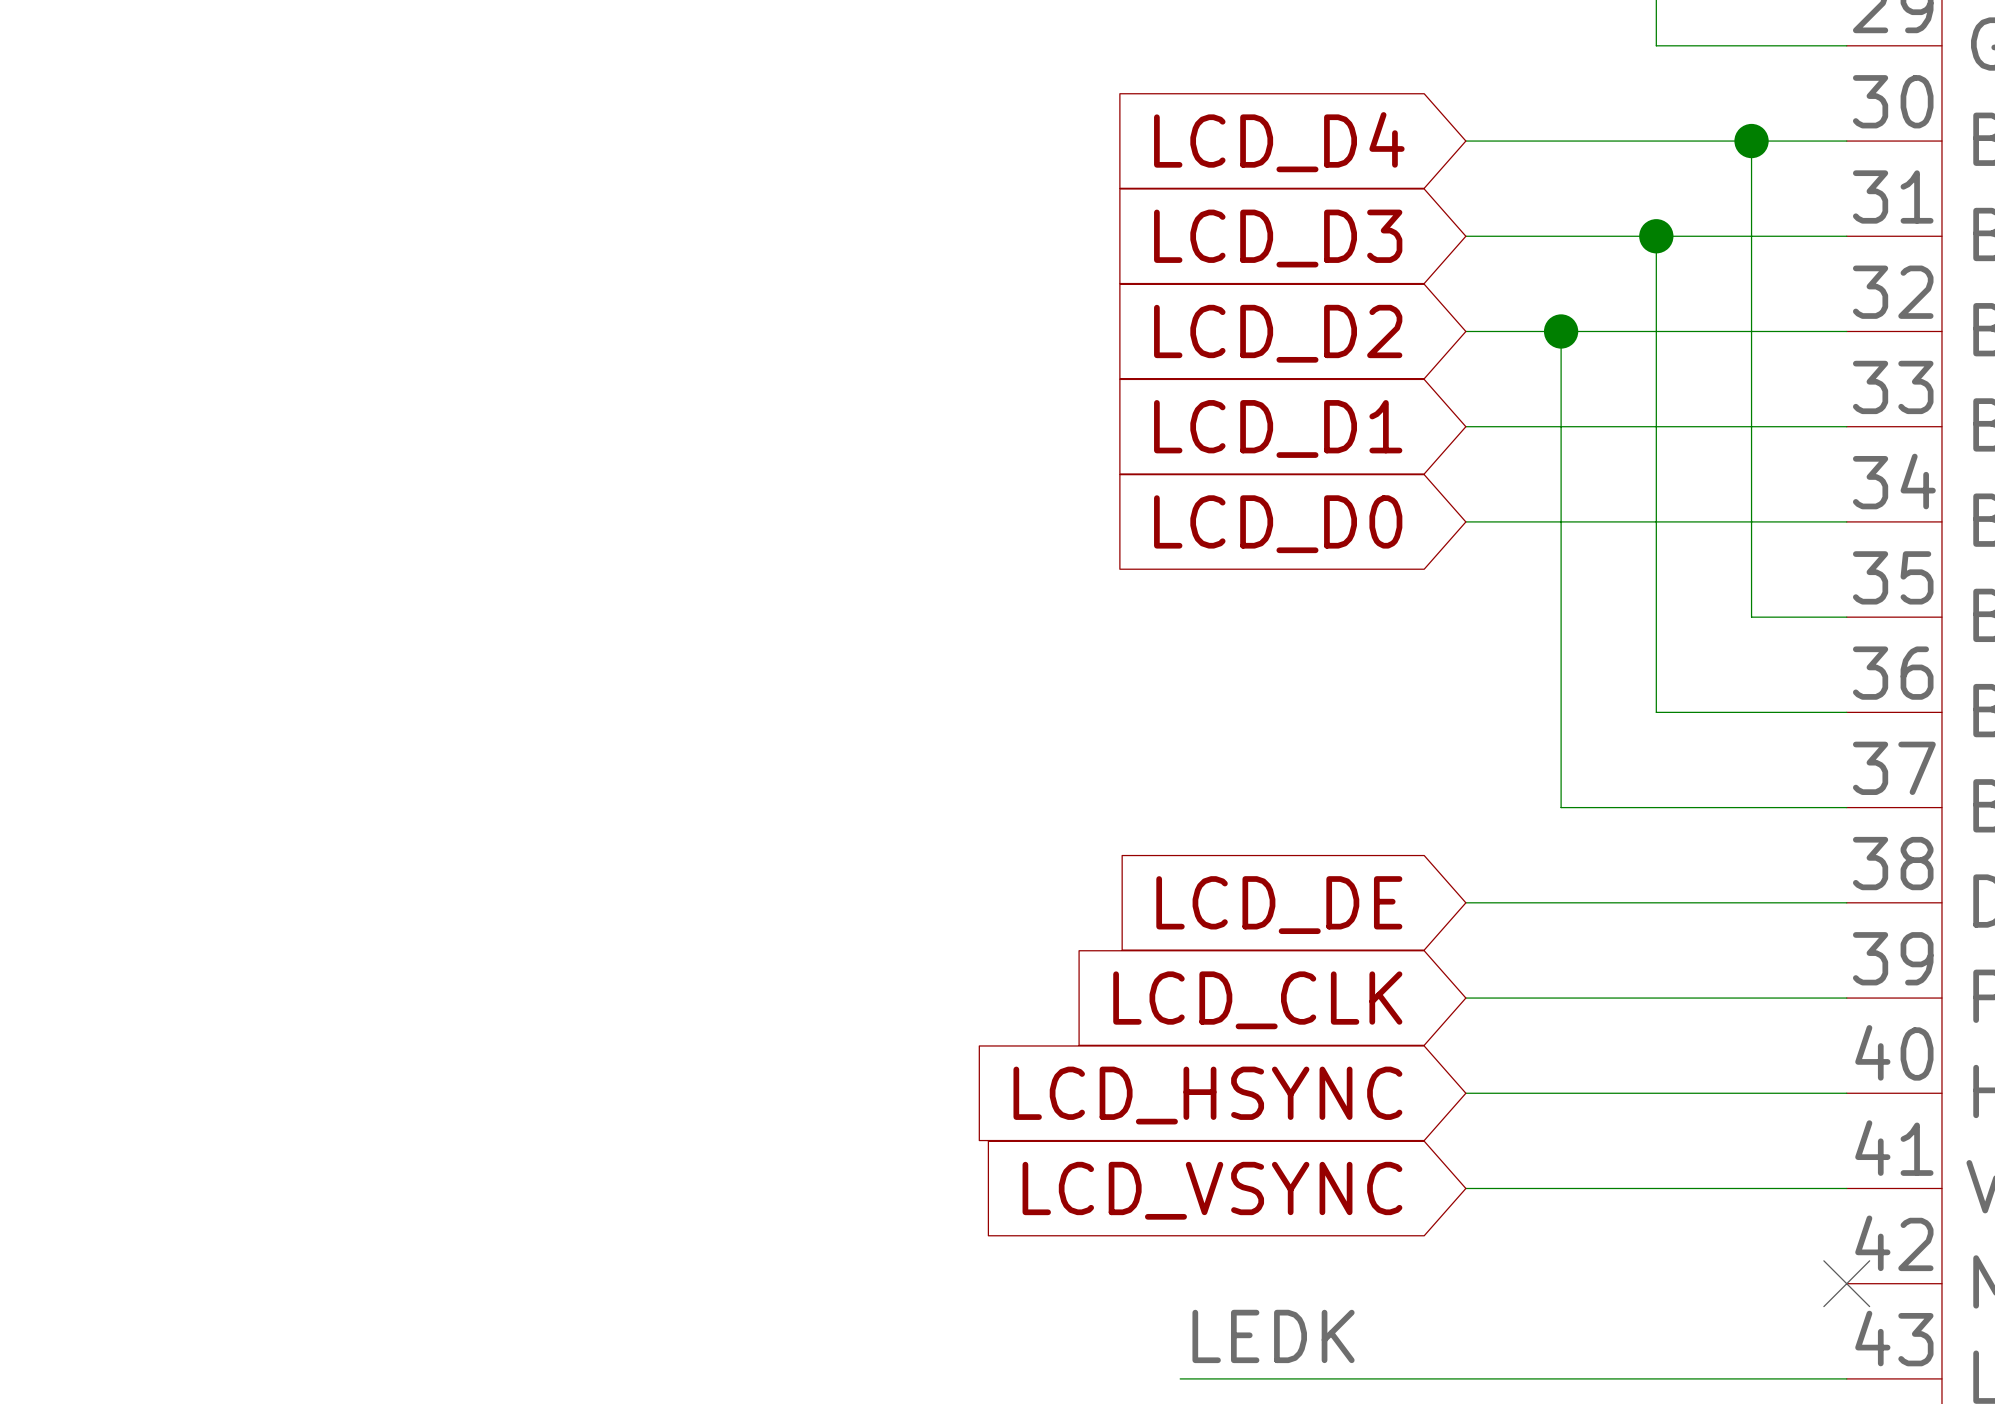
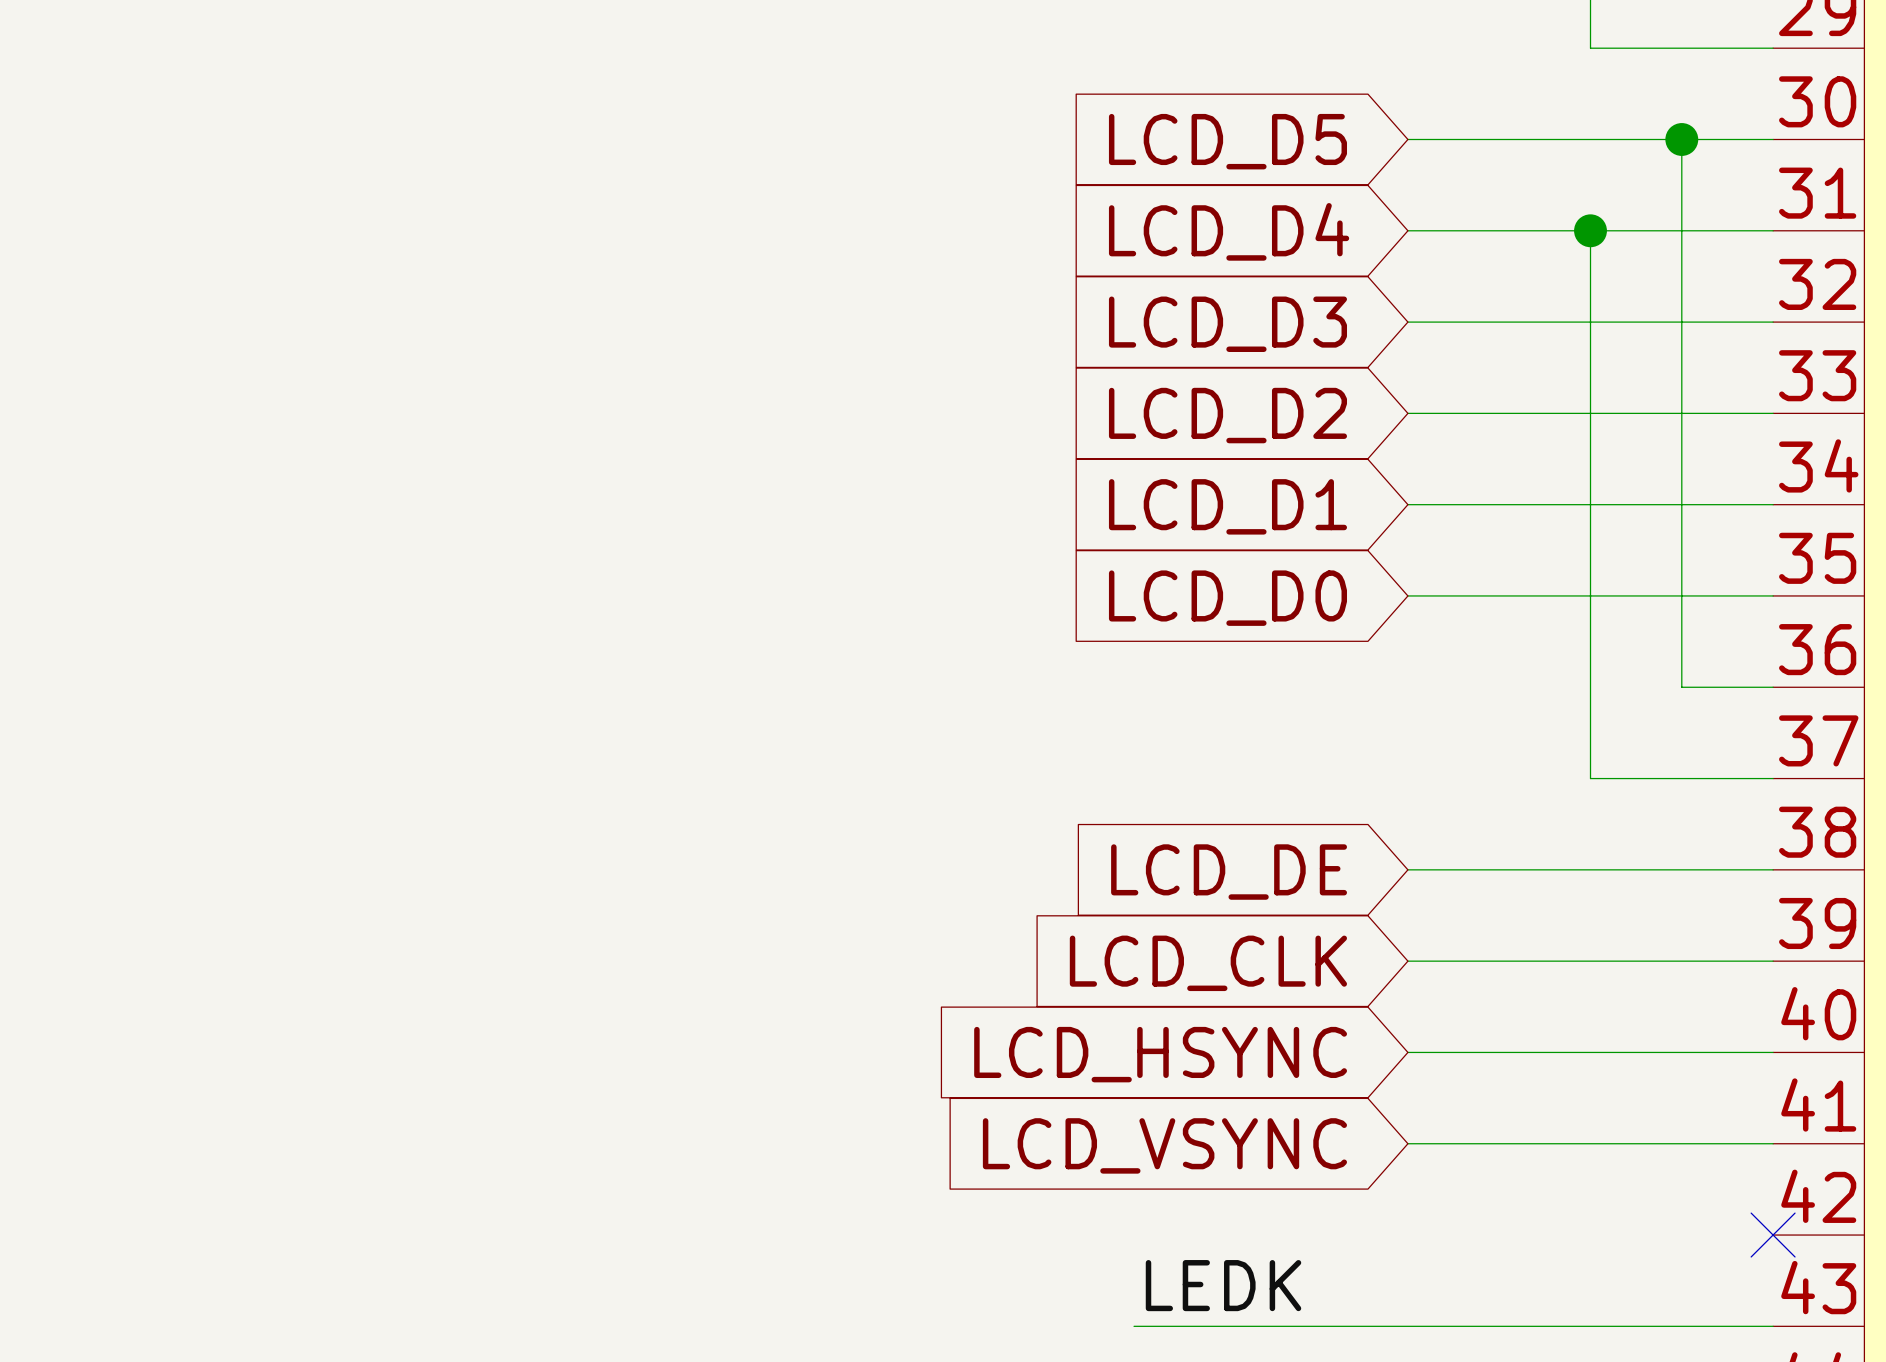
global label: LCD_D4 (1279, 142) -> LCD_D5 (1227, 141)
global label: LCD_D3 (1278, 238) -> LCD_D4 (1229, 231)
wire: (1561, 331) (1561, 807) (1656, 807) -> none
junction: (1561, 331) -> none
global label: LCD_D2 (1278, 333) -> LCD_D3 (1227, 324)
global label: LCD_D1 (1278, 428) -> LCD_D2 (1227, 415)
global label: LCD_D0 (1278, 524) -> LCD_D1 (1227, 506)
wire: none -> (1407, 595) (1681, 595) (1681, 687)
global label: none -> LCD_D0 (1227, 598)
wire: (1656, 712) (1751, 712) -> (1590, 687) (1590, 778)

